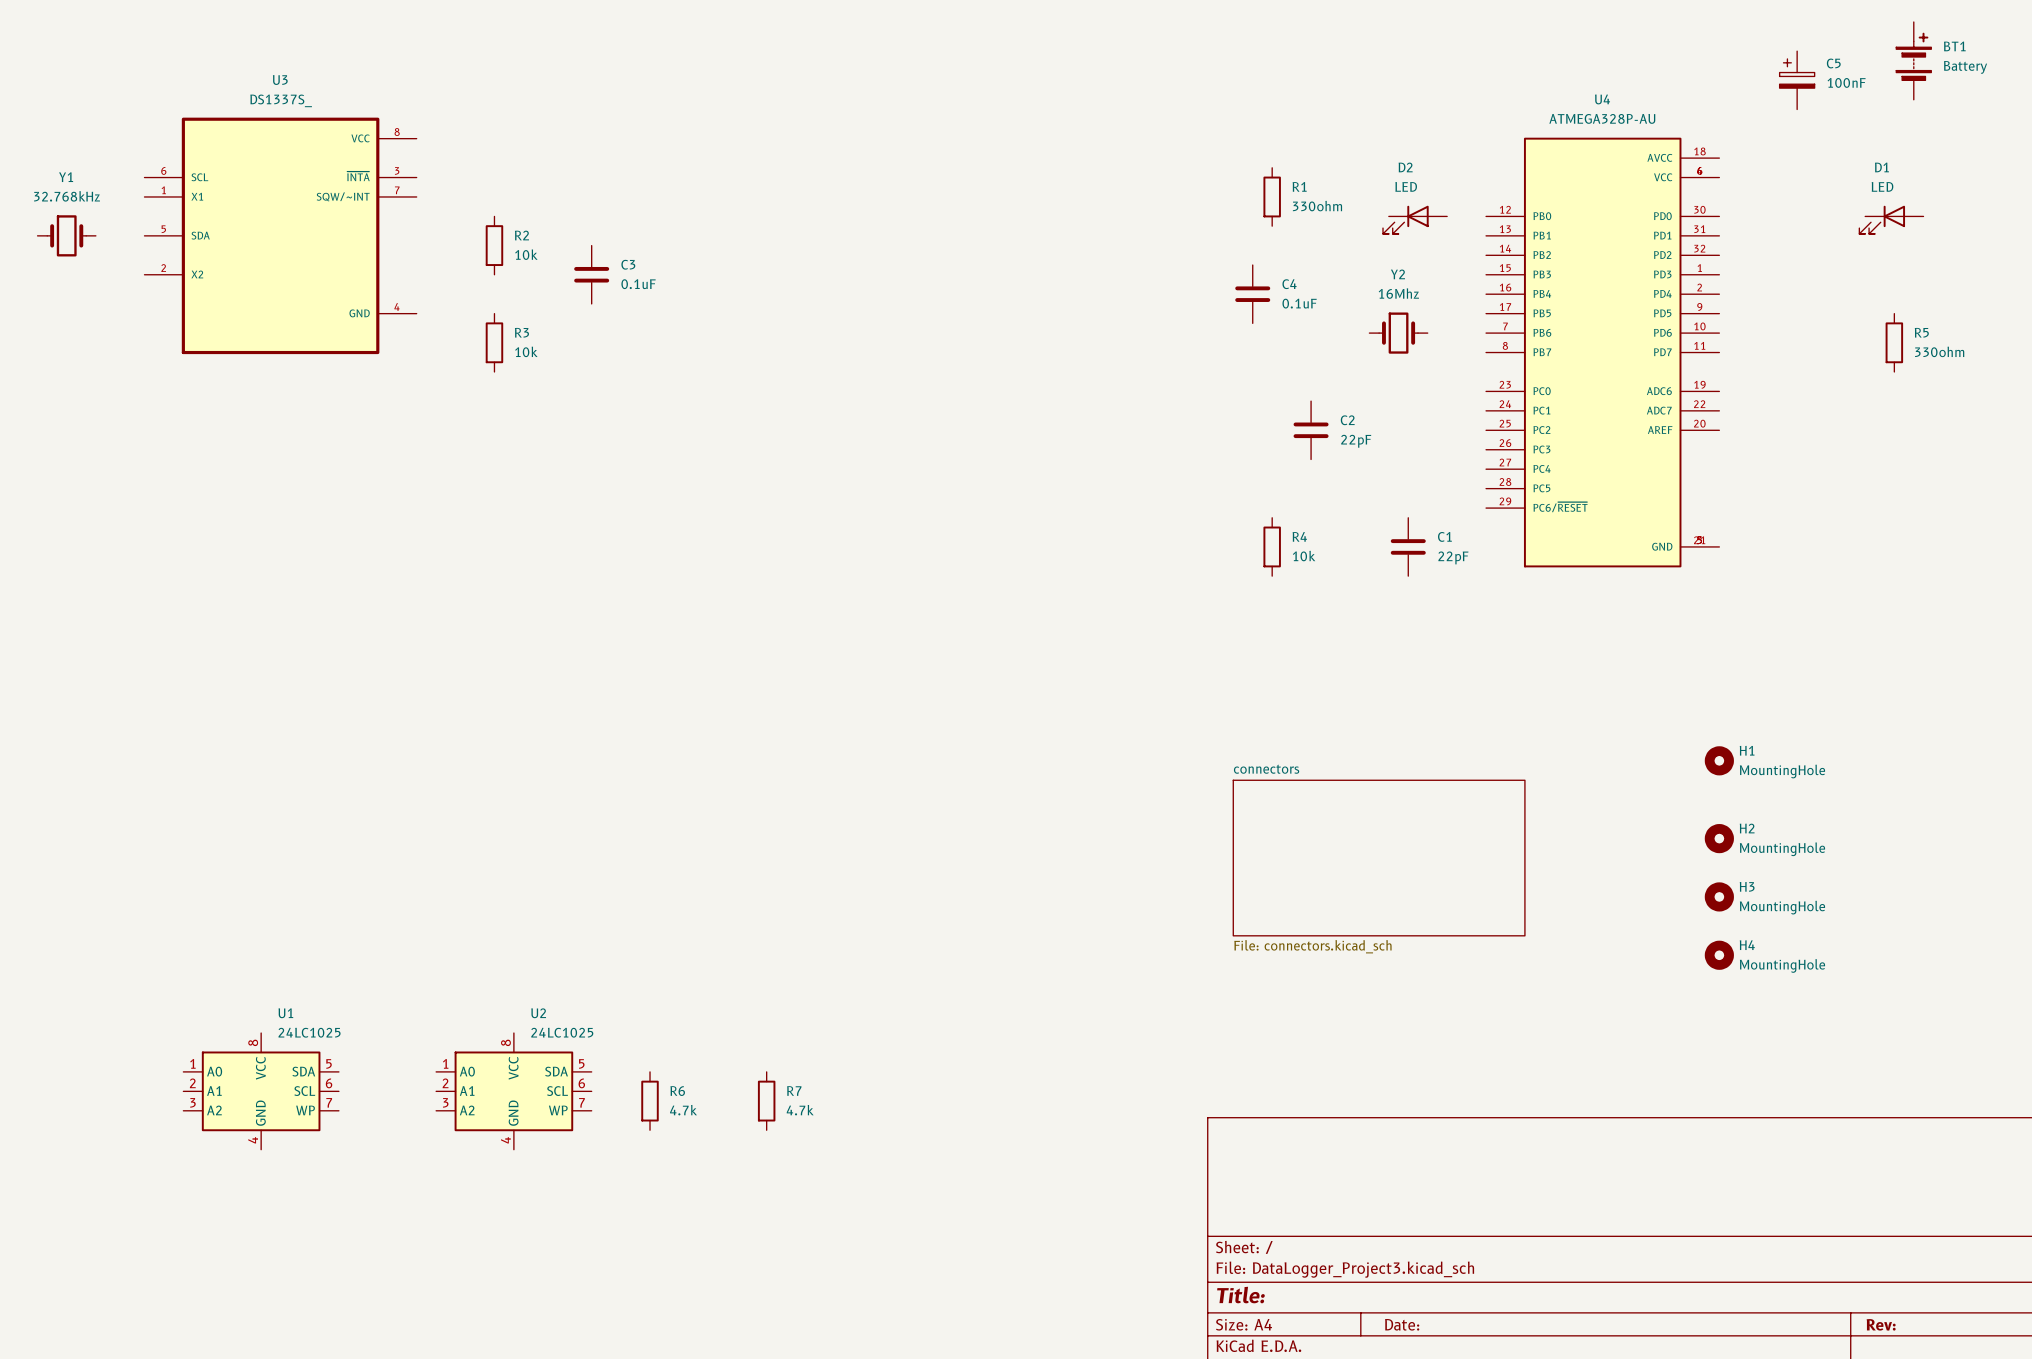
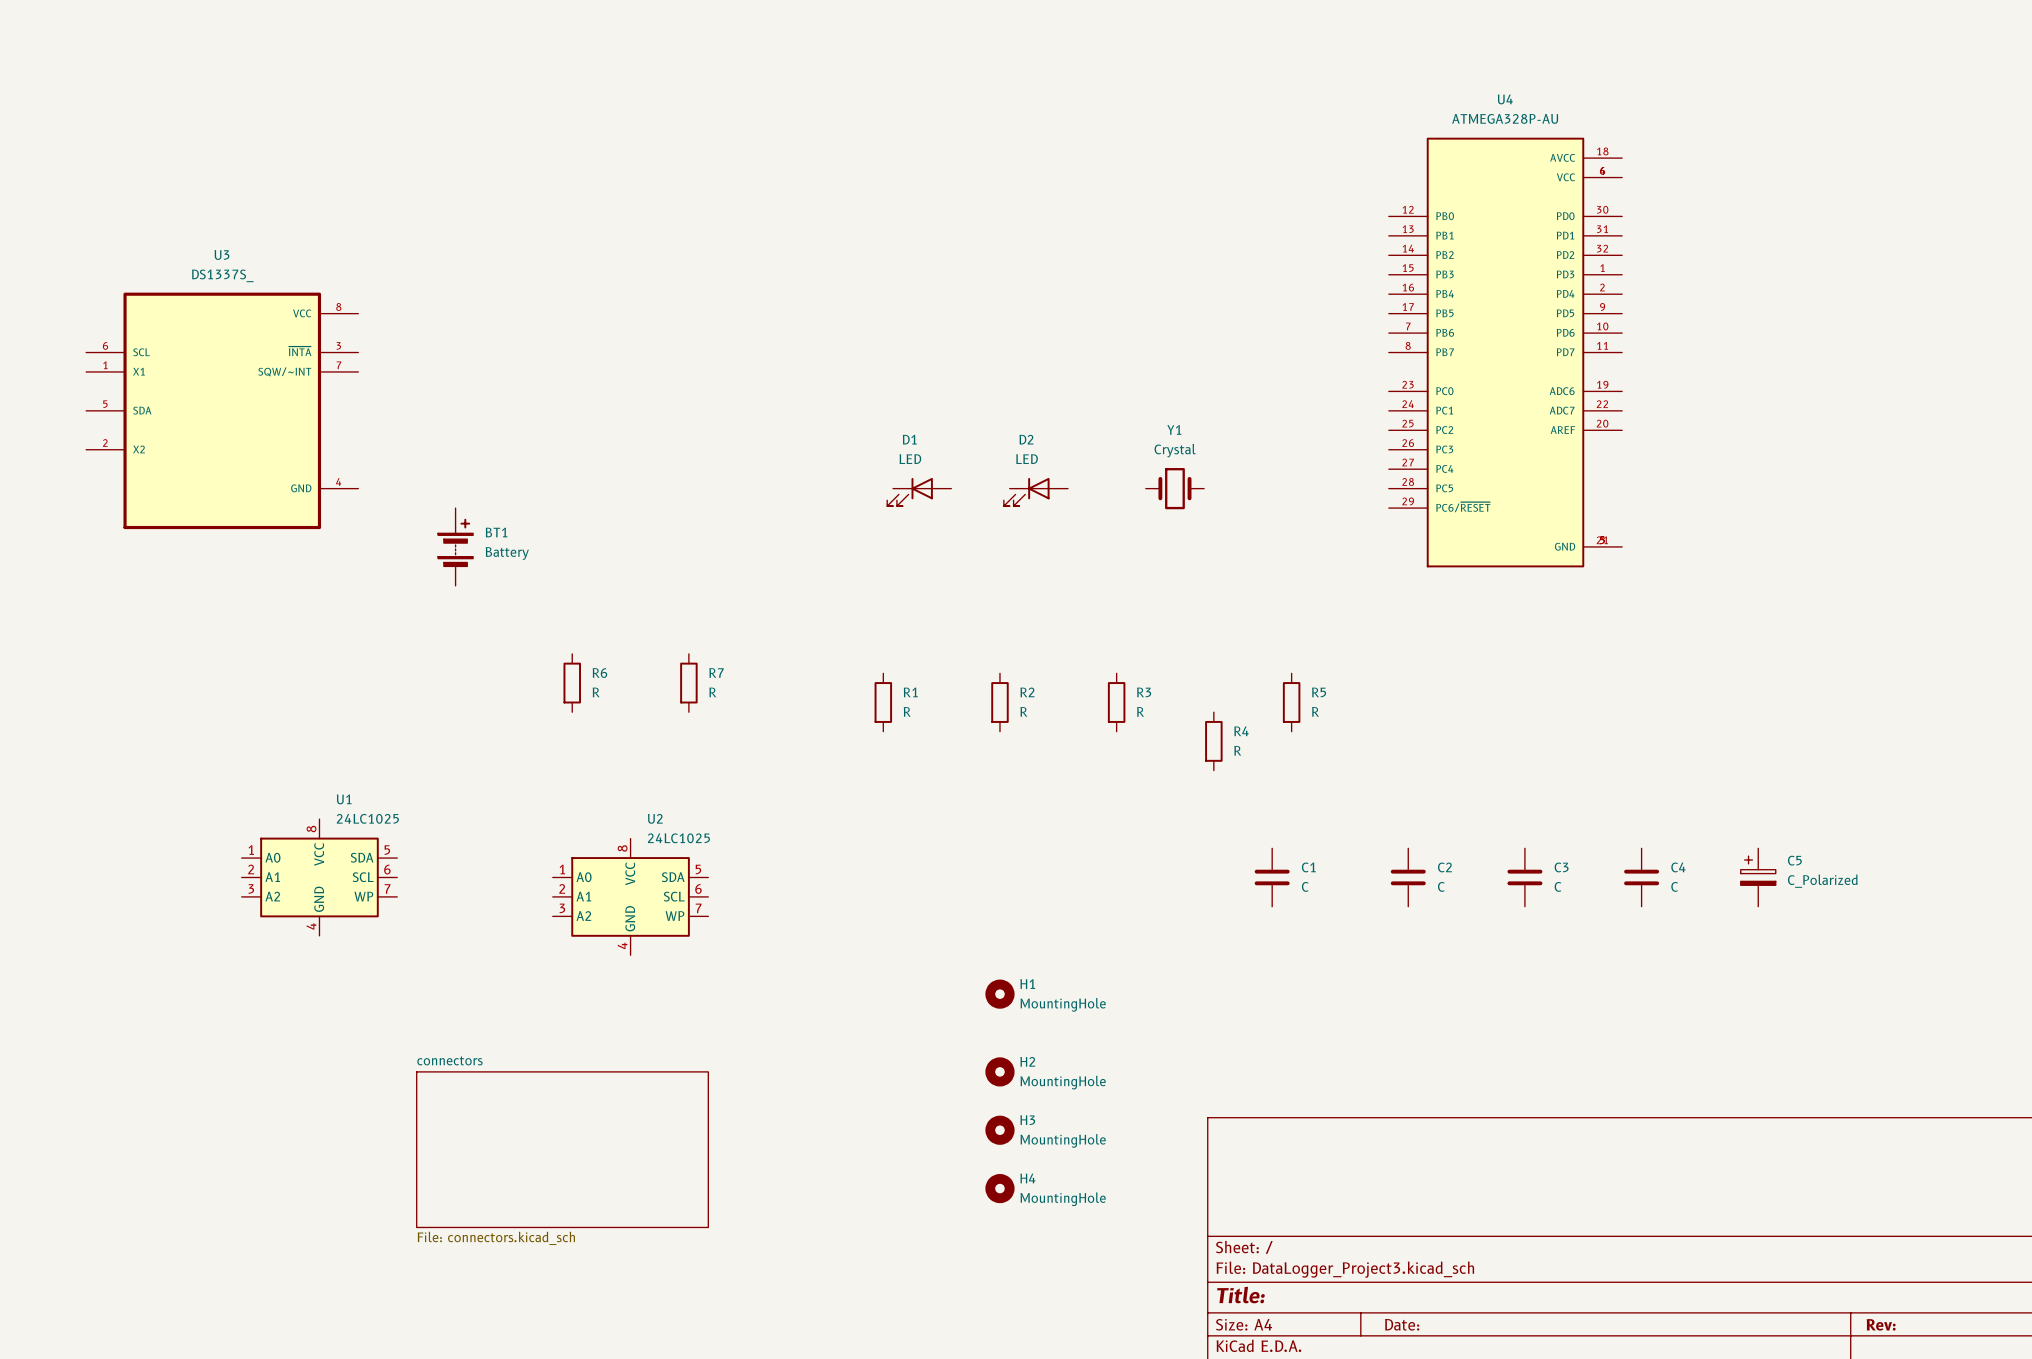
BT1 position: (1913, 60) -> (455, 546)
C5 position: (1797, 80) -> (1758, 877)
C5 value: 100nF (1846, 82) -> C_Polarized (1822, 881)
Y1 value: 32.768kHz (67, 196) -> Crystal (1175, 450)
R1 position: (1272, 196) -> (883, 702)
R1 value: 330ohm (1317, 206) -> R (907, 711)
D2 position: (1415, 219) -> (1035, 492)
D1 position: (1891, 219) -> (919, 492)
Y1 position: (66, 235) -> (1174, 488)
U3 position: (280, 235) -> (222, 410)
R2 position: (494, 245) -> (999, 702)
R2 value: 10k (526, 254) -> R (1023, 711)
C3 position: (591, 274) -> (1524, 877)
C3 value: 0.1uF (638, 284) -> C (1557, 886)
C4 position: (1252, 294) -> (1641, 877)
C4 value: 0.1uF (1299, 303) -> C (1674, 886)
Y2: 16Mhz (1398, 333) -> none
R3 position: (494, 342) -> (1116, 702)
R5 position: (1894, 342) -> (1291, 702)
R3 value: 10k (526, 351) -> R (1140, 711)
R5 value: 330ohm (1939, 351) -> R (1315, 711)
U4 position: (1602, 352) -> (1505, 352)
C2 position: (1311, 430) -> (1408, 877)
C2 value: 22pF (1356, 441) -> C (1441, 886)
R4 position: (1272, 546) -> (1213, 741)
C1 position: (1408, 546) -> (1272, 877)
R4 value: 10k (1304, 556) -> R (1237, 750)
C1 value: 22pF (1453, 557) -> C (1305, 886)
H1 position: (1719, 760) -> (999, 994)
H2 position: (1719, 838) -> (999, 1071)
sheet connectors: File: connectors.kicad_sch (1379, 858) -> none
H3 position: (1719, 896) -> (999, 1130)
H4 position: (1719, 955) -> (999, 1188)
U1 position: (261, 1091) -> (319, 877)
U2 position: (513, 1091) -> (630, 896)
R6 position: (650, 1101) -> (572, 683)
R7 position: (766, 1101) -> (688, 683)
R6 value: 4.7k (683, 1110) -> R (596, 692)
R7 value: 4.7k (800, 1110) -> R (712, 692)
sheet connectors: none -> File: connectors.kicad_sch (562, 1149)

